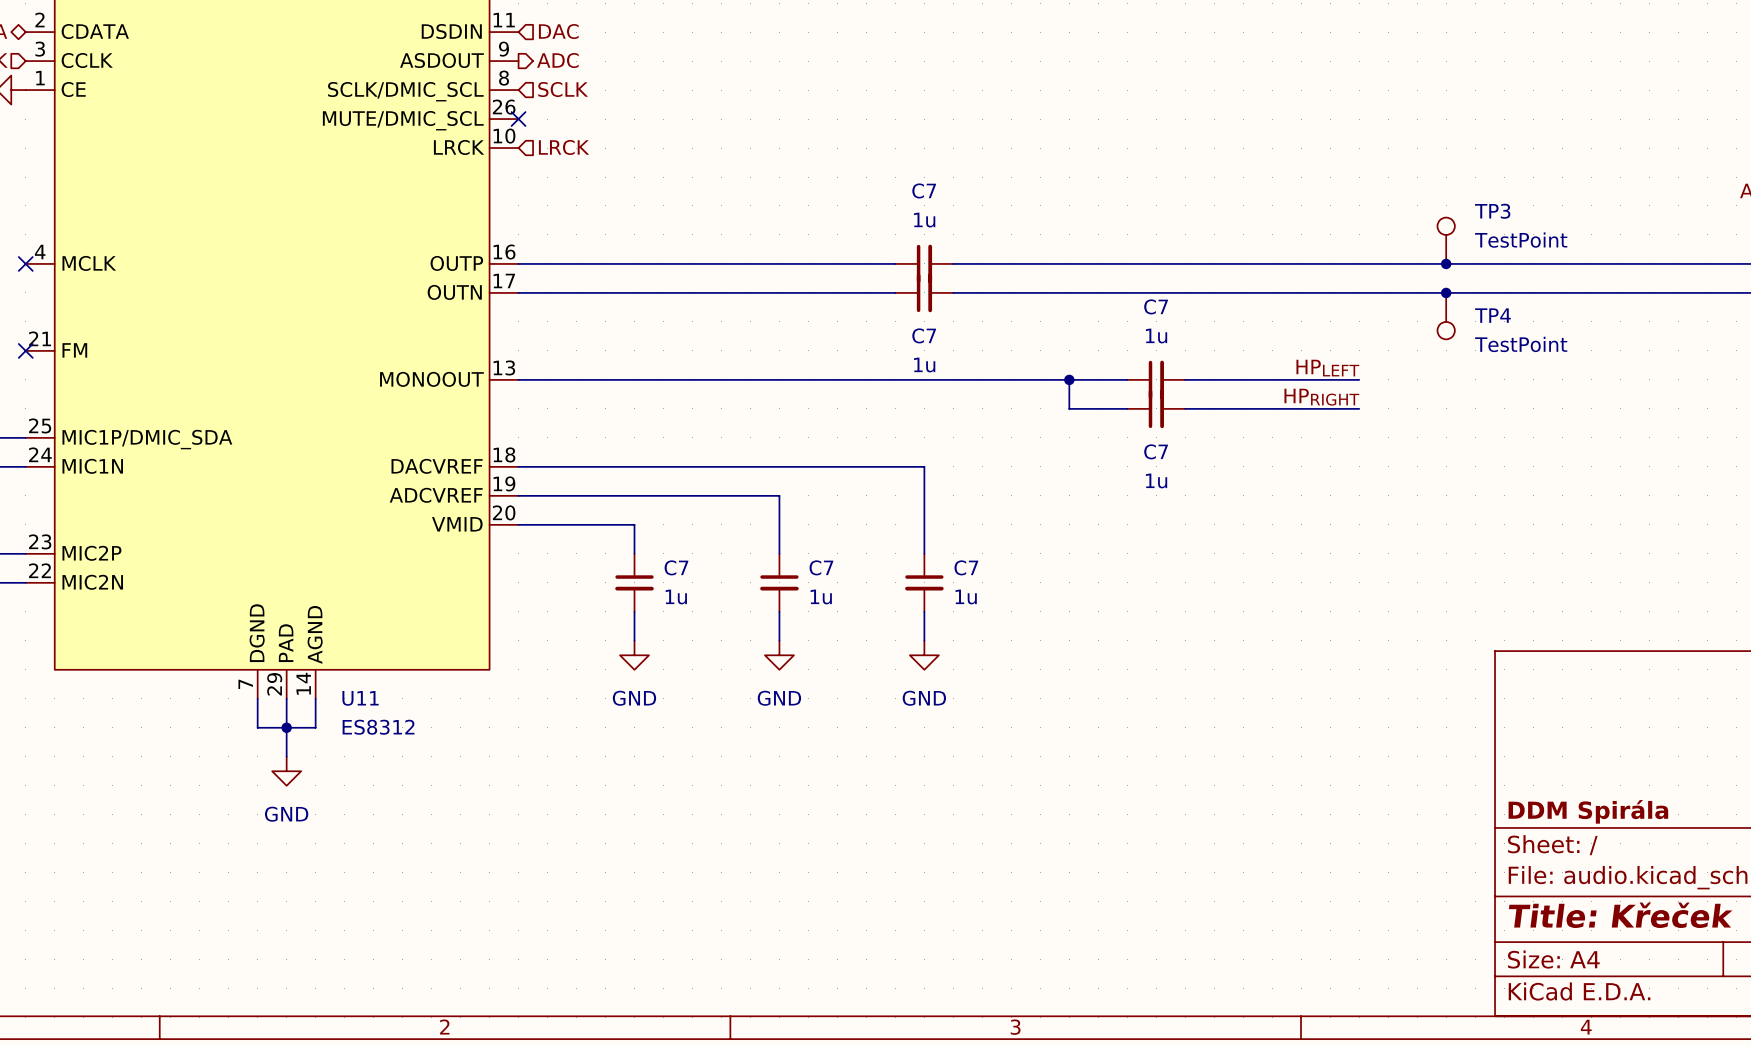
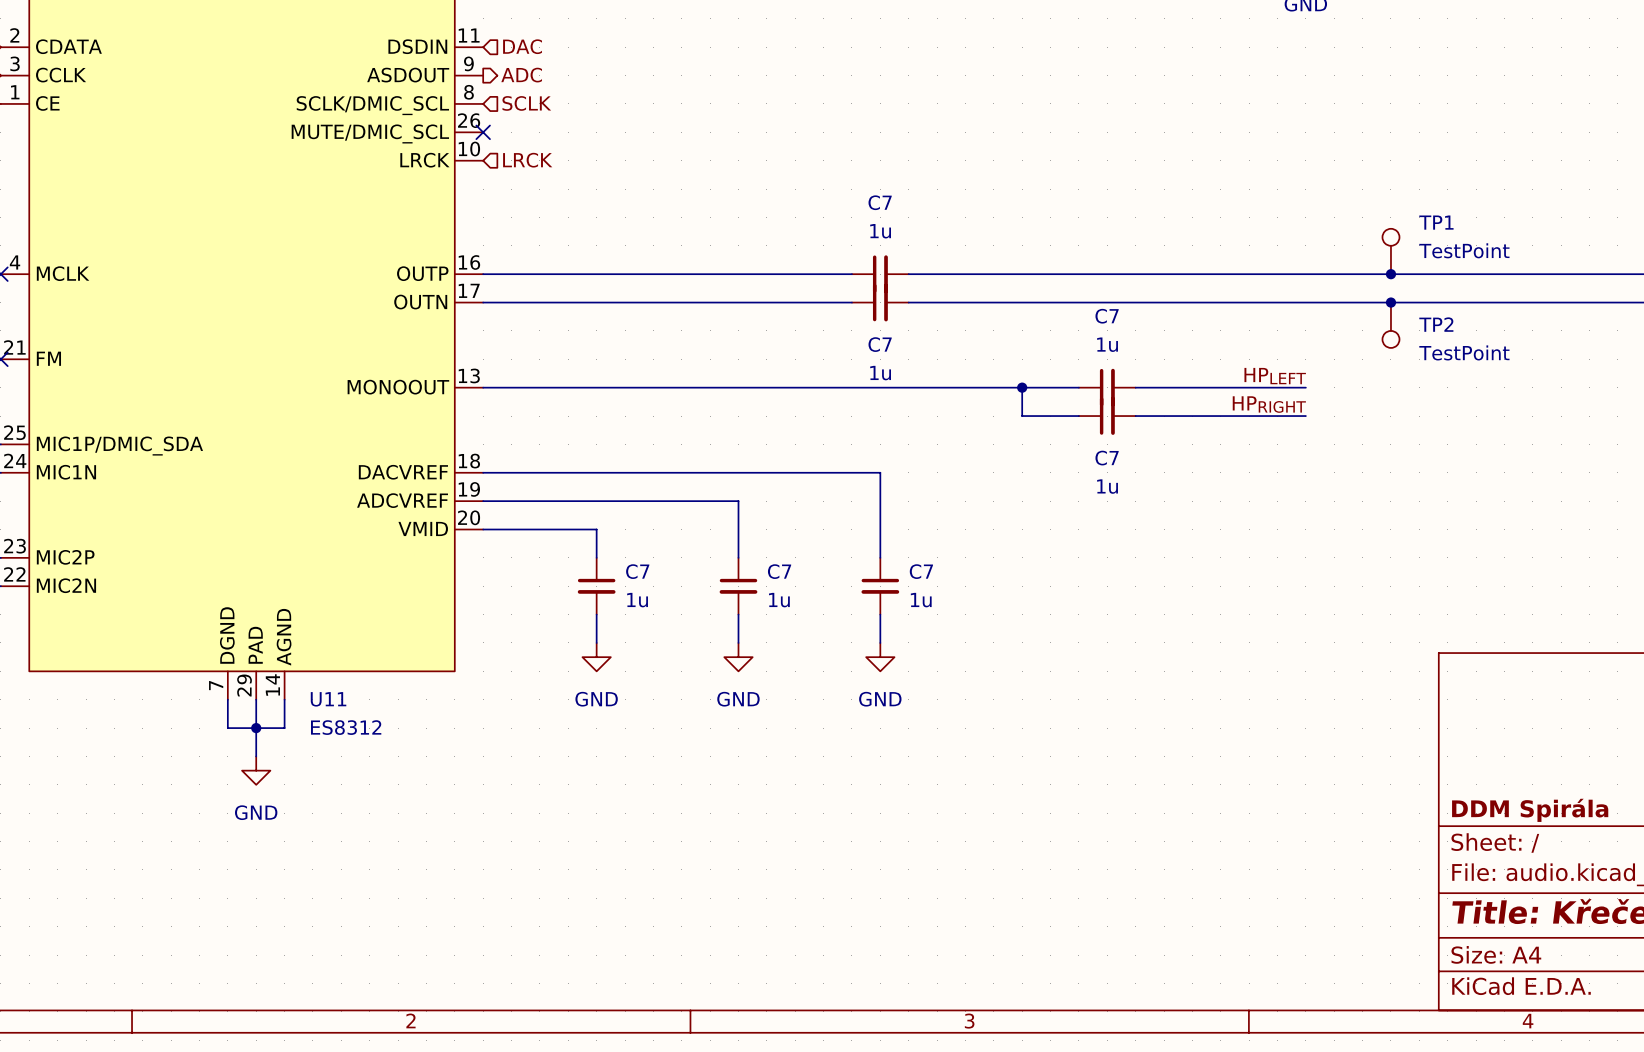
TP3 name: TP3 (1492, 211) -> TP1 (1436, 222)
TP4 name: TP4 (1492, 315) -> TP2 (1436, 324)

